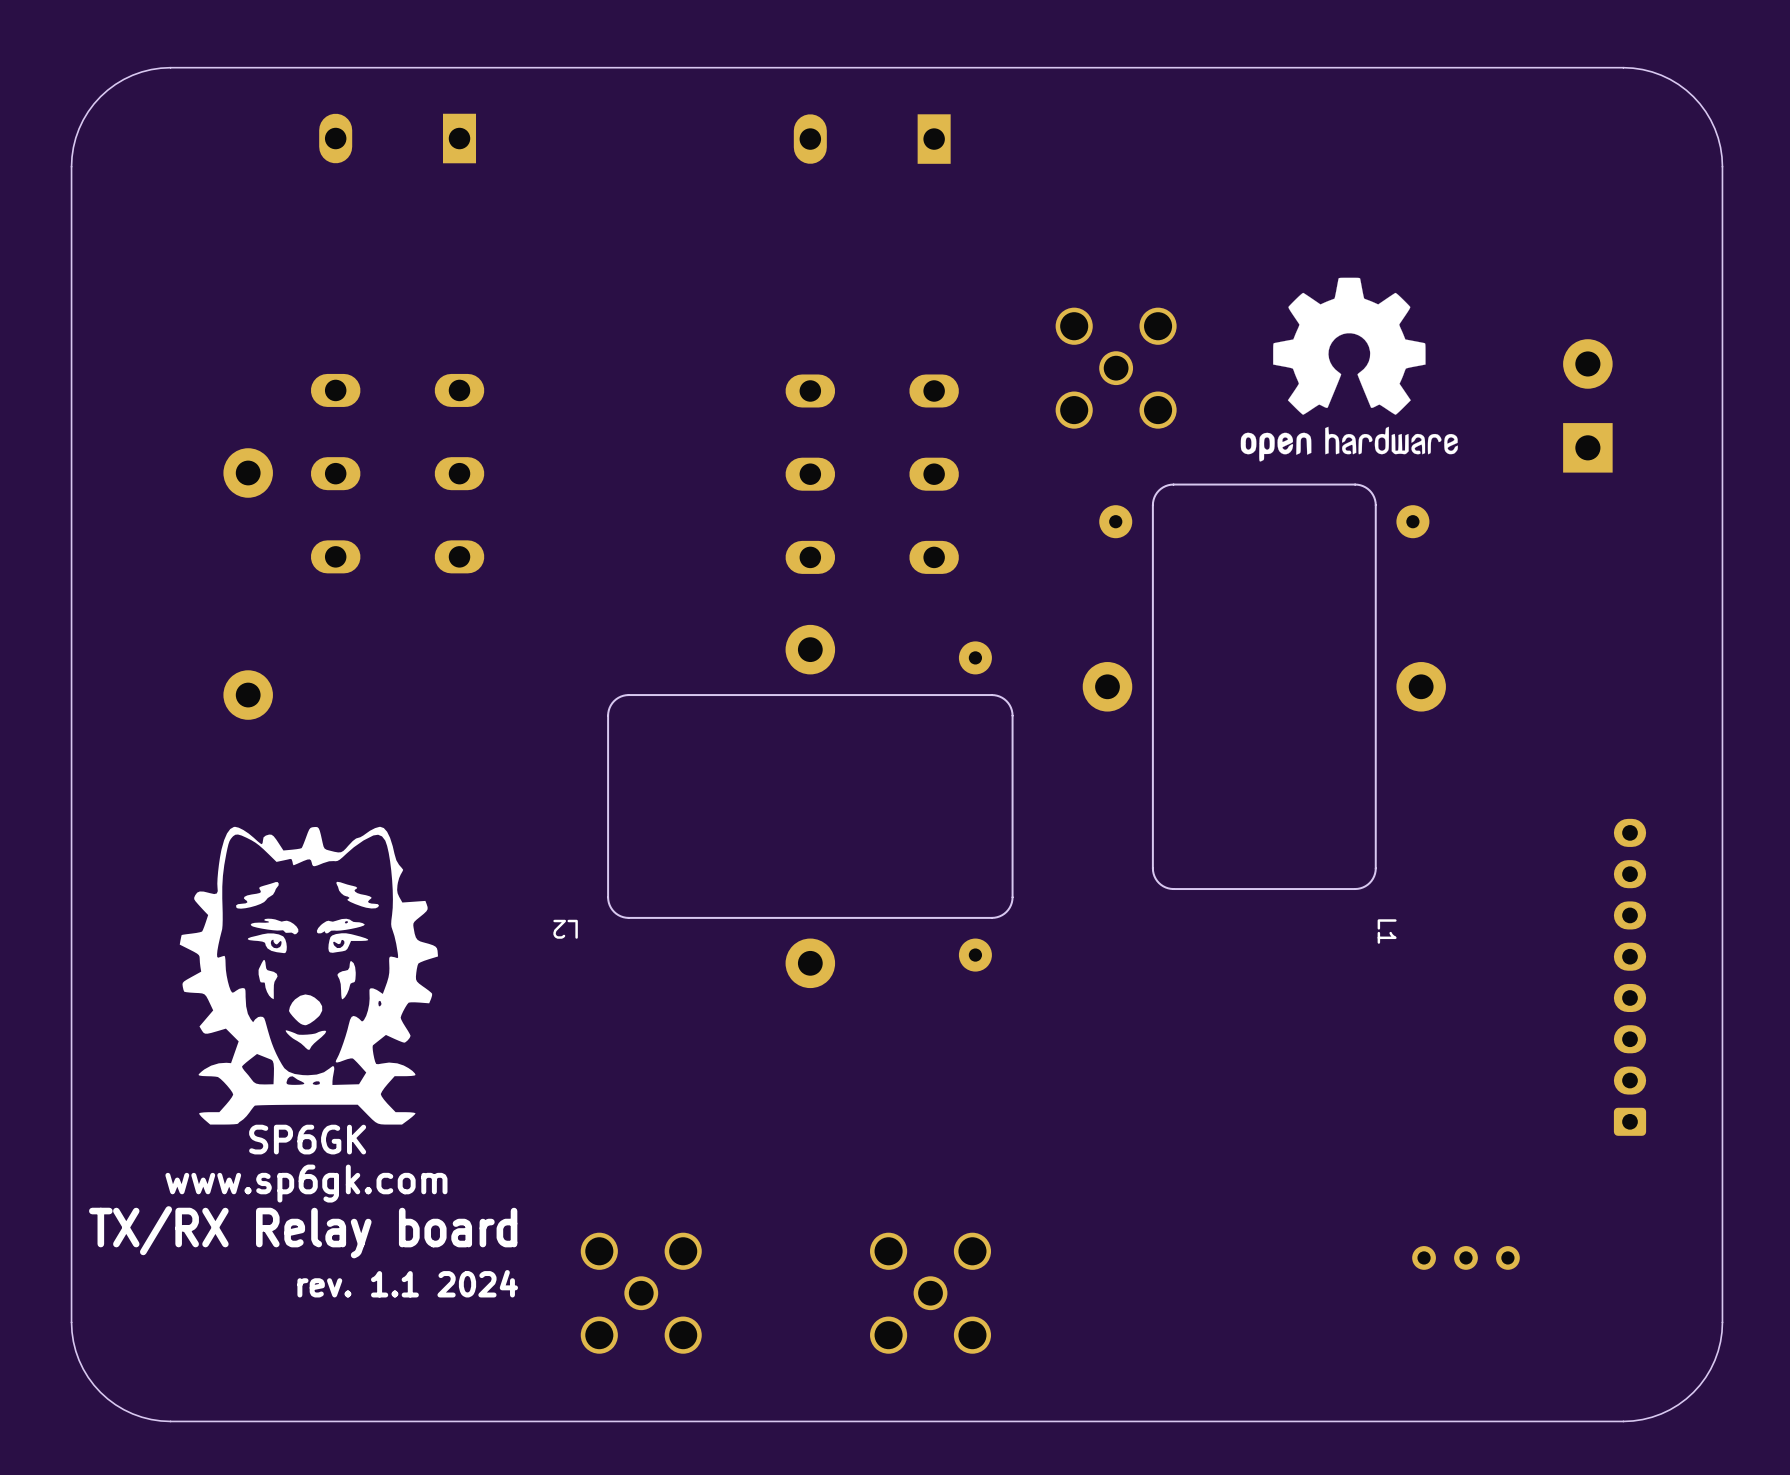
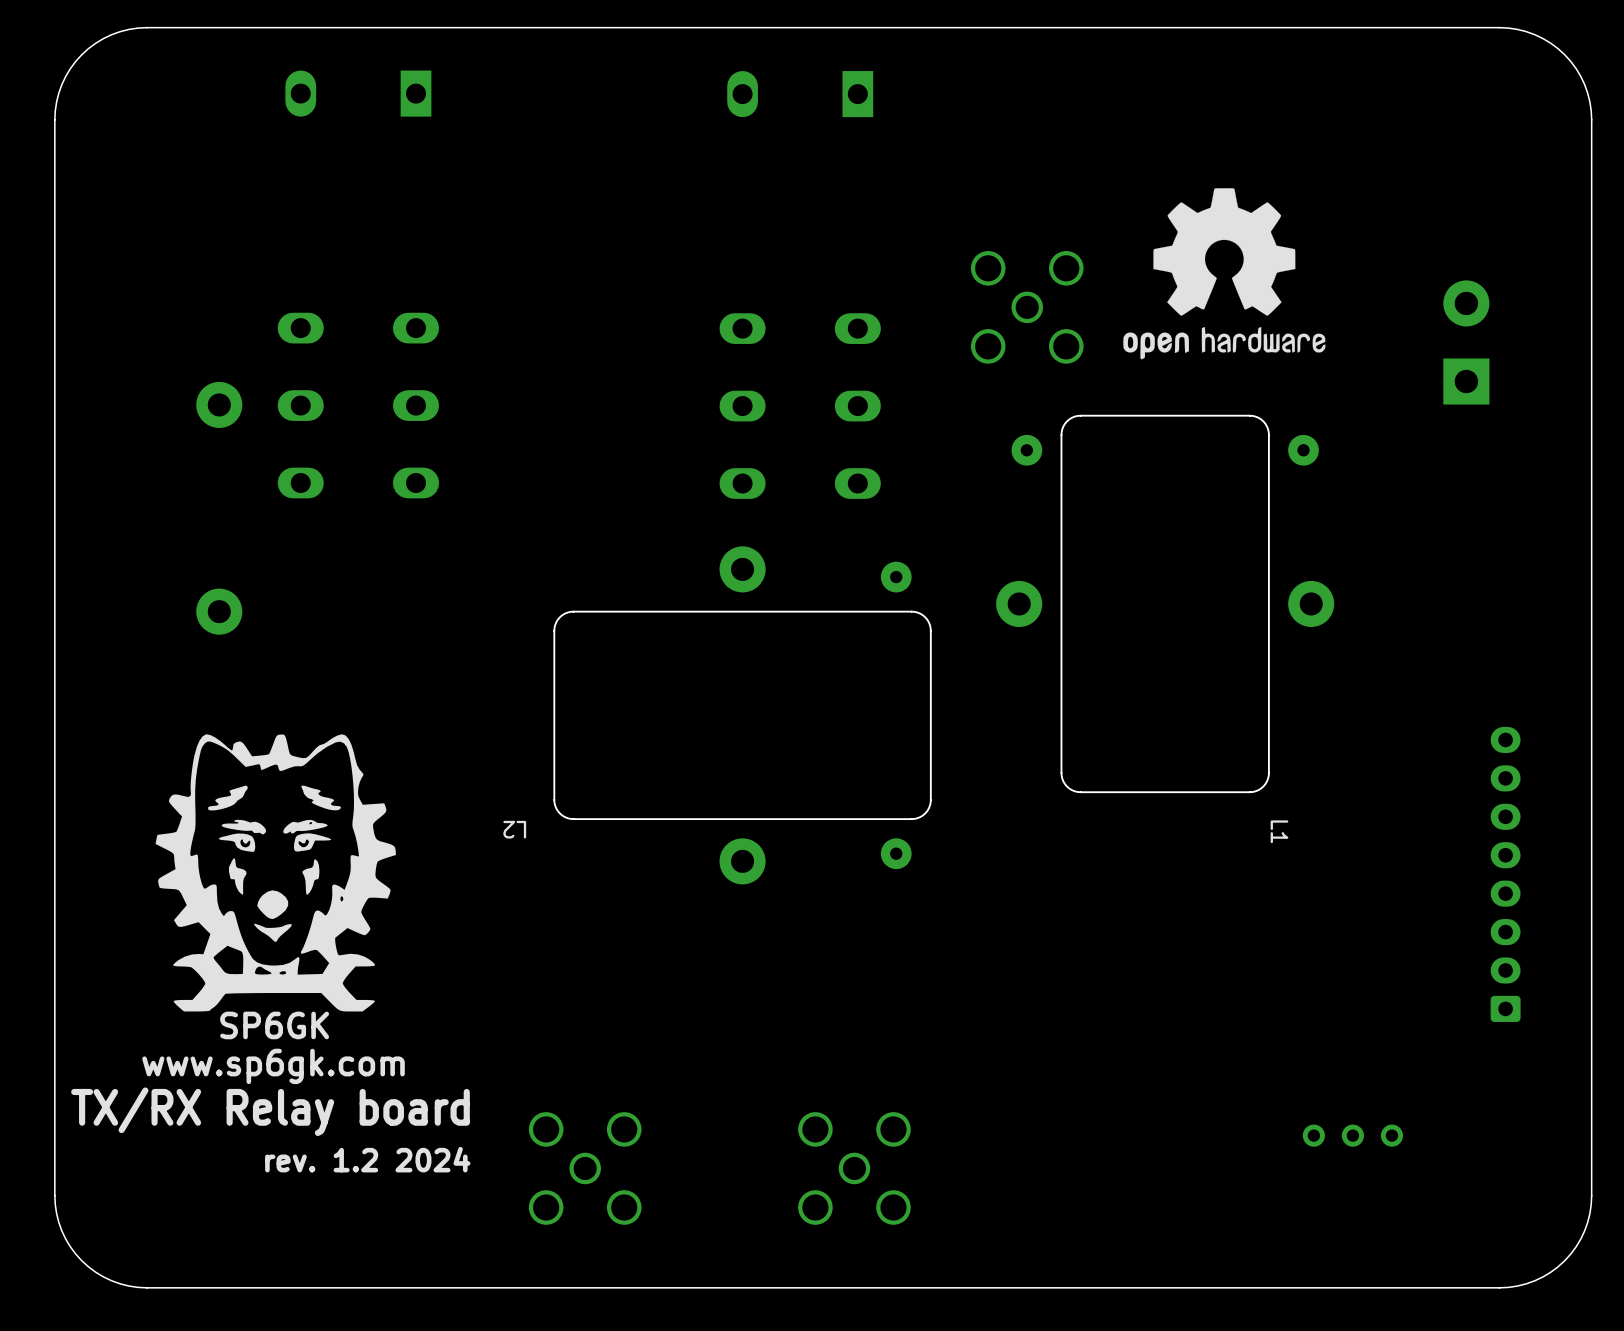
drawing position: (1349, 369) -> (1224, 273)
text: rev. 1.1 2024 (407, 1283) -> rev. 1.2 2024 (367, 1159)

